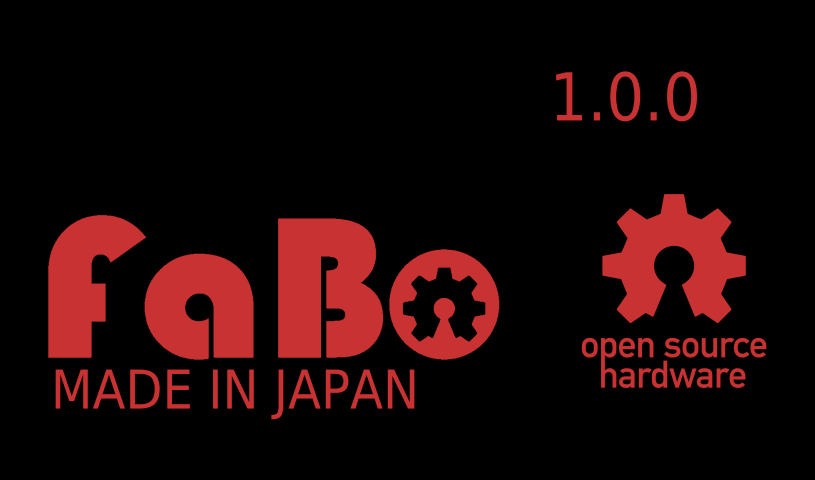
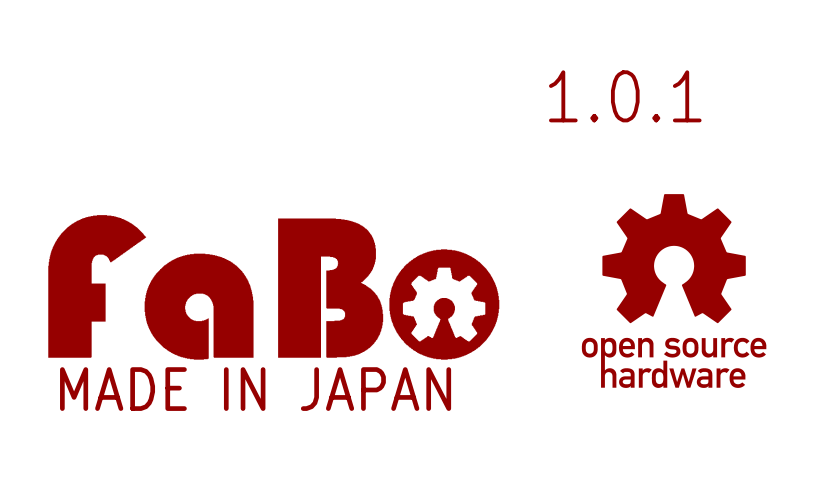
text: 1.0.0 (626, 96) -> 1.0.1 (625, 96)

